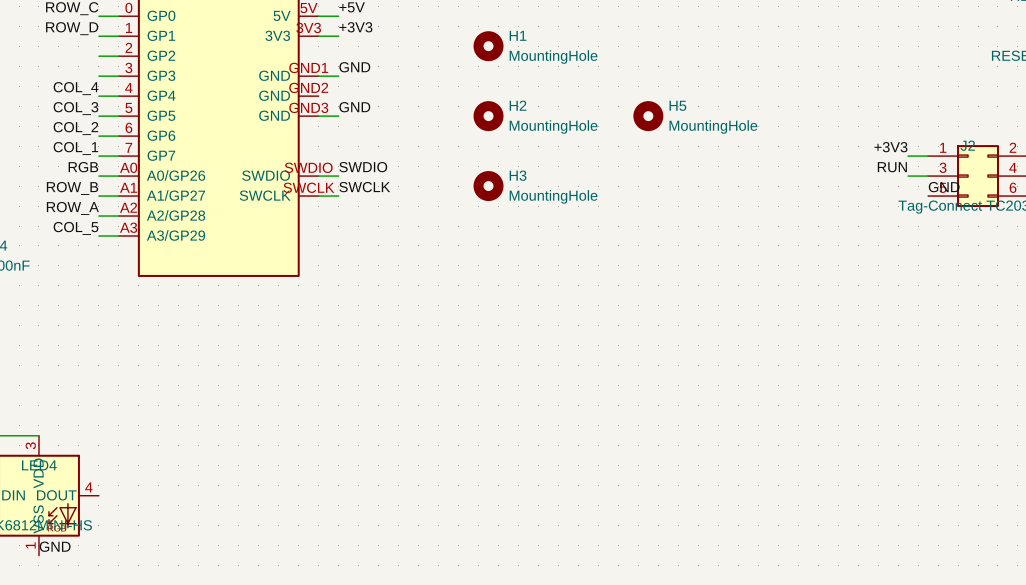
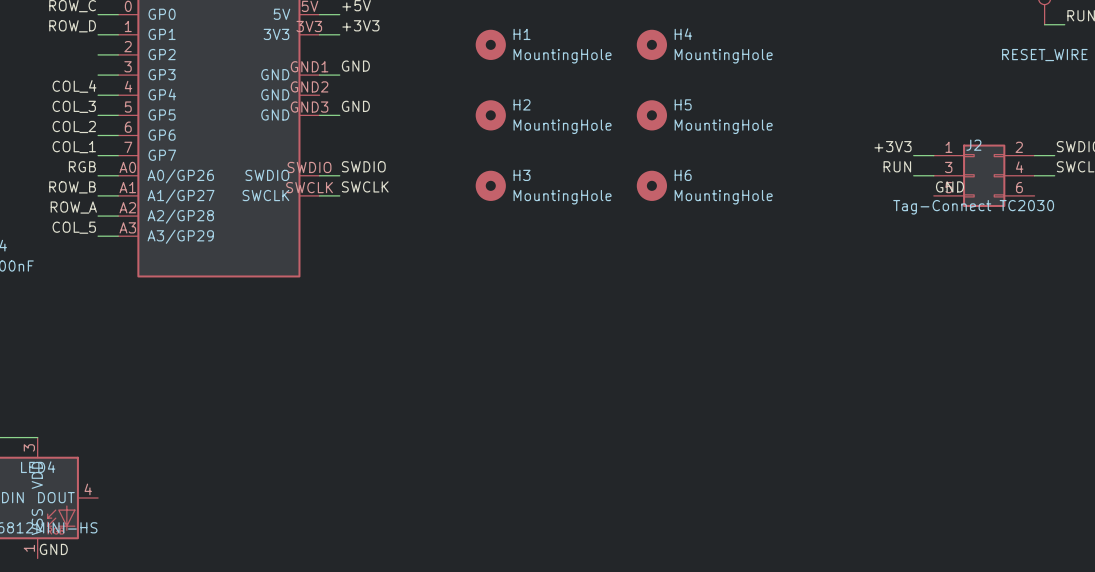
H4: none -> MountingHole (651, 44)
H6: none -> MountingHole (651, 185)

